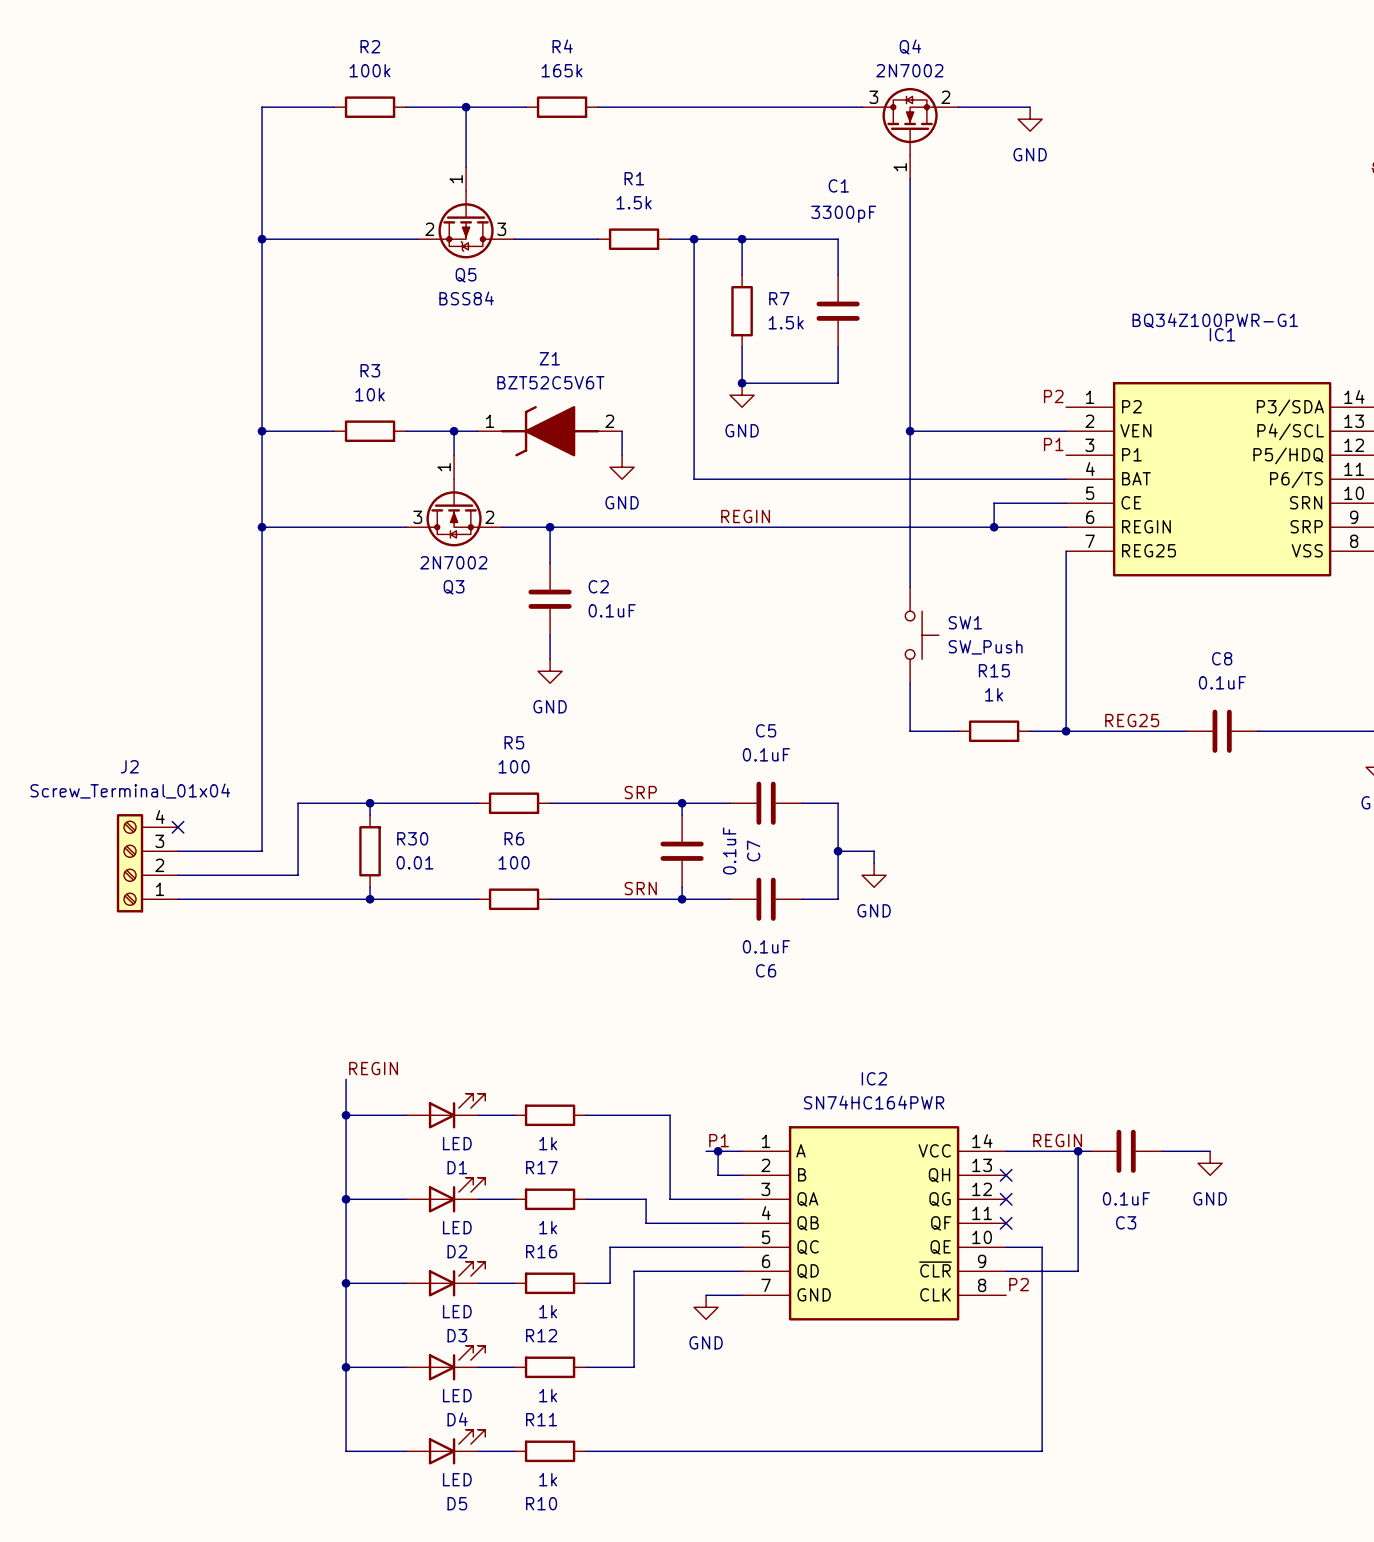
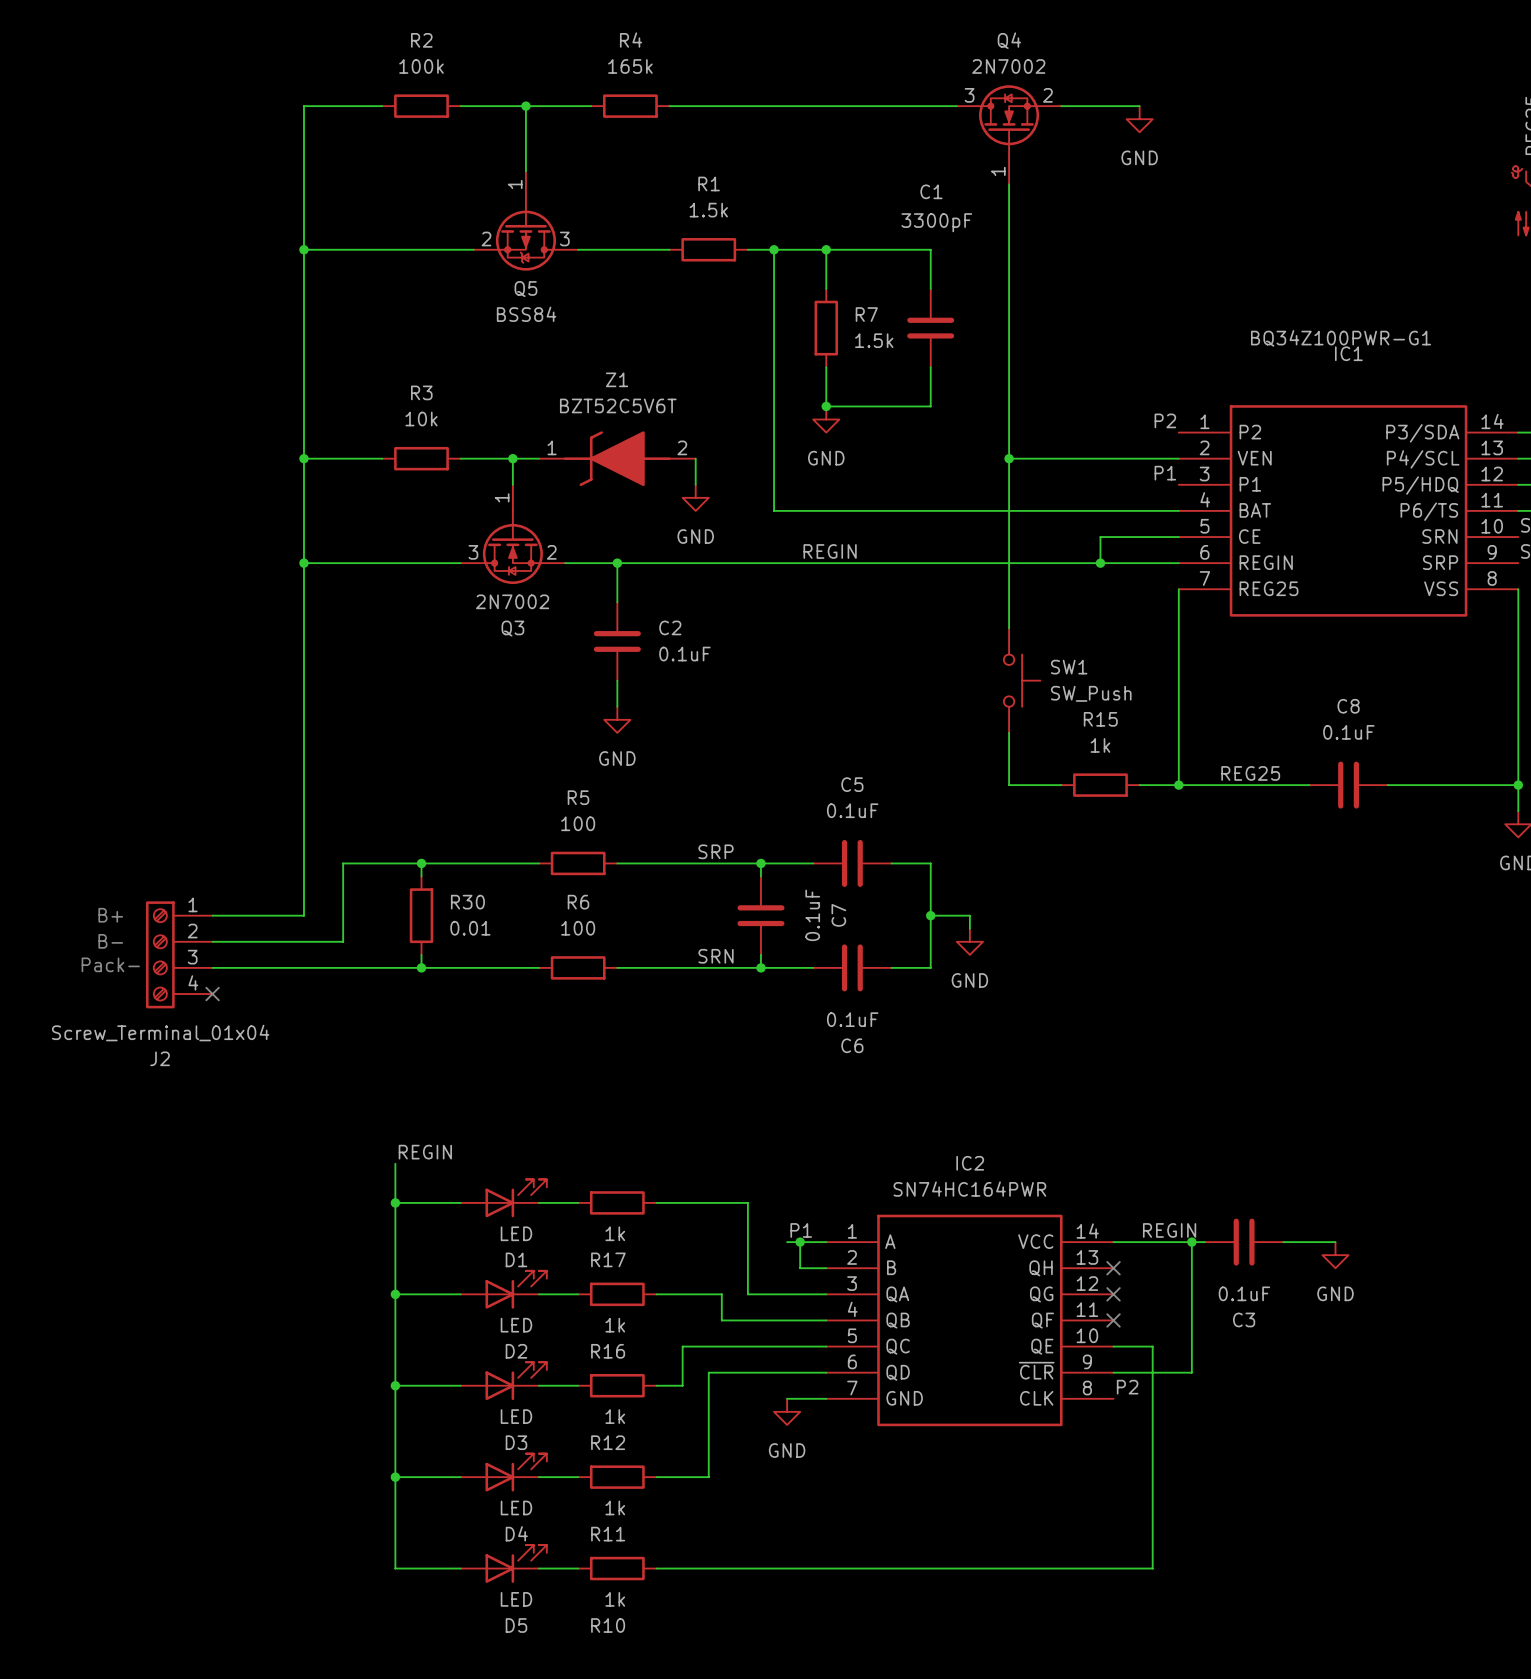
no-connect mark: (178, 827) -> none
text: none -> B+ (110, 915)
J2 flip: as is (130, 863) -> up-down (160, 954)
text: none -> B- (110, 941)
text: none -> Pack- (110, 964)
no-connect mark: none -> (212, 994)

